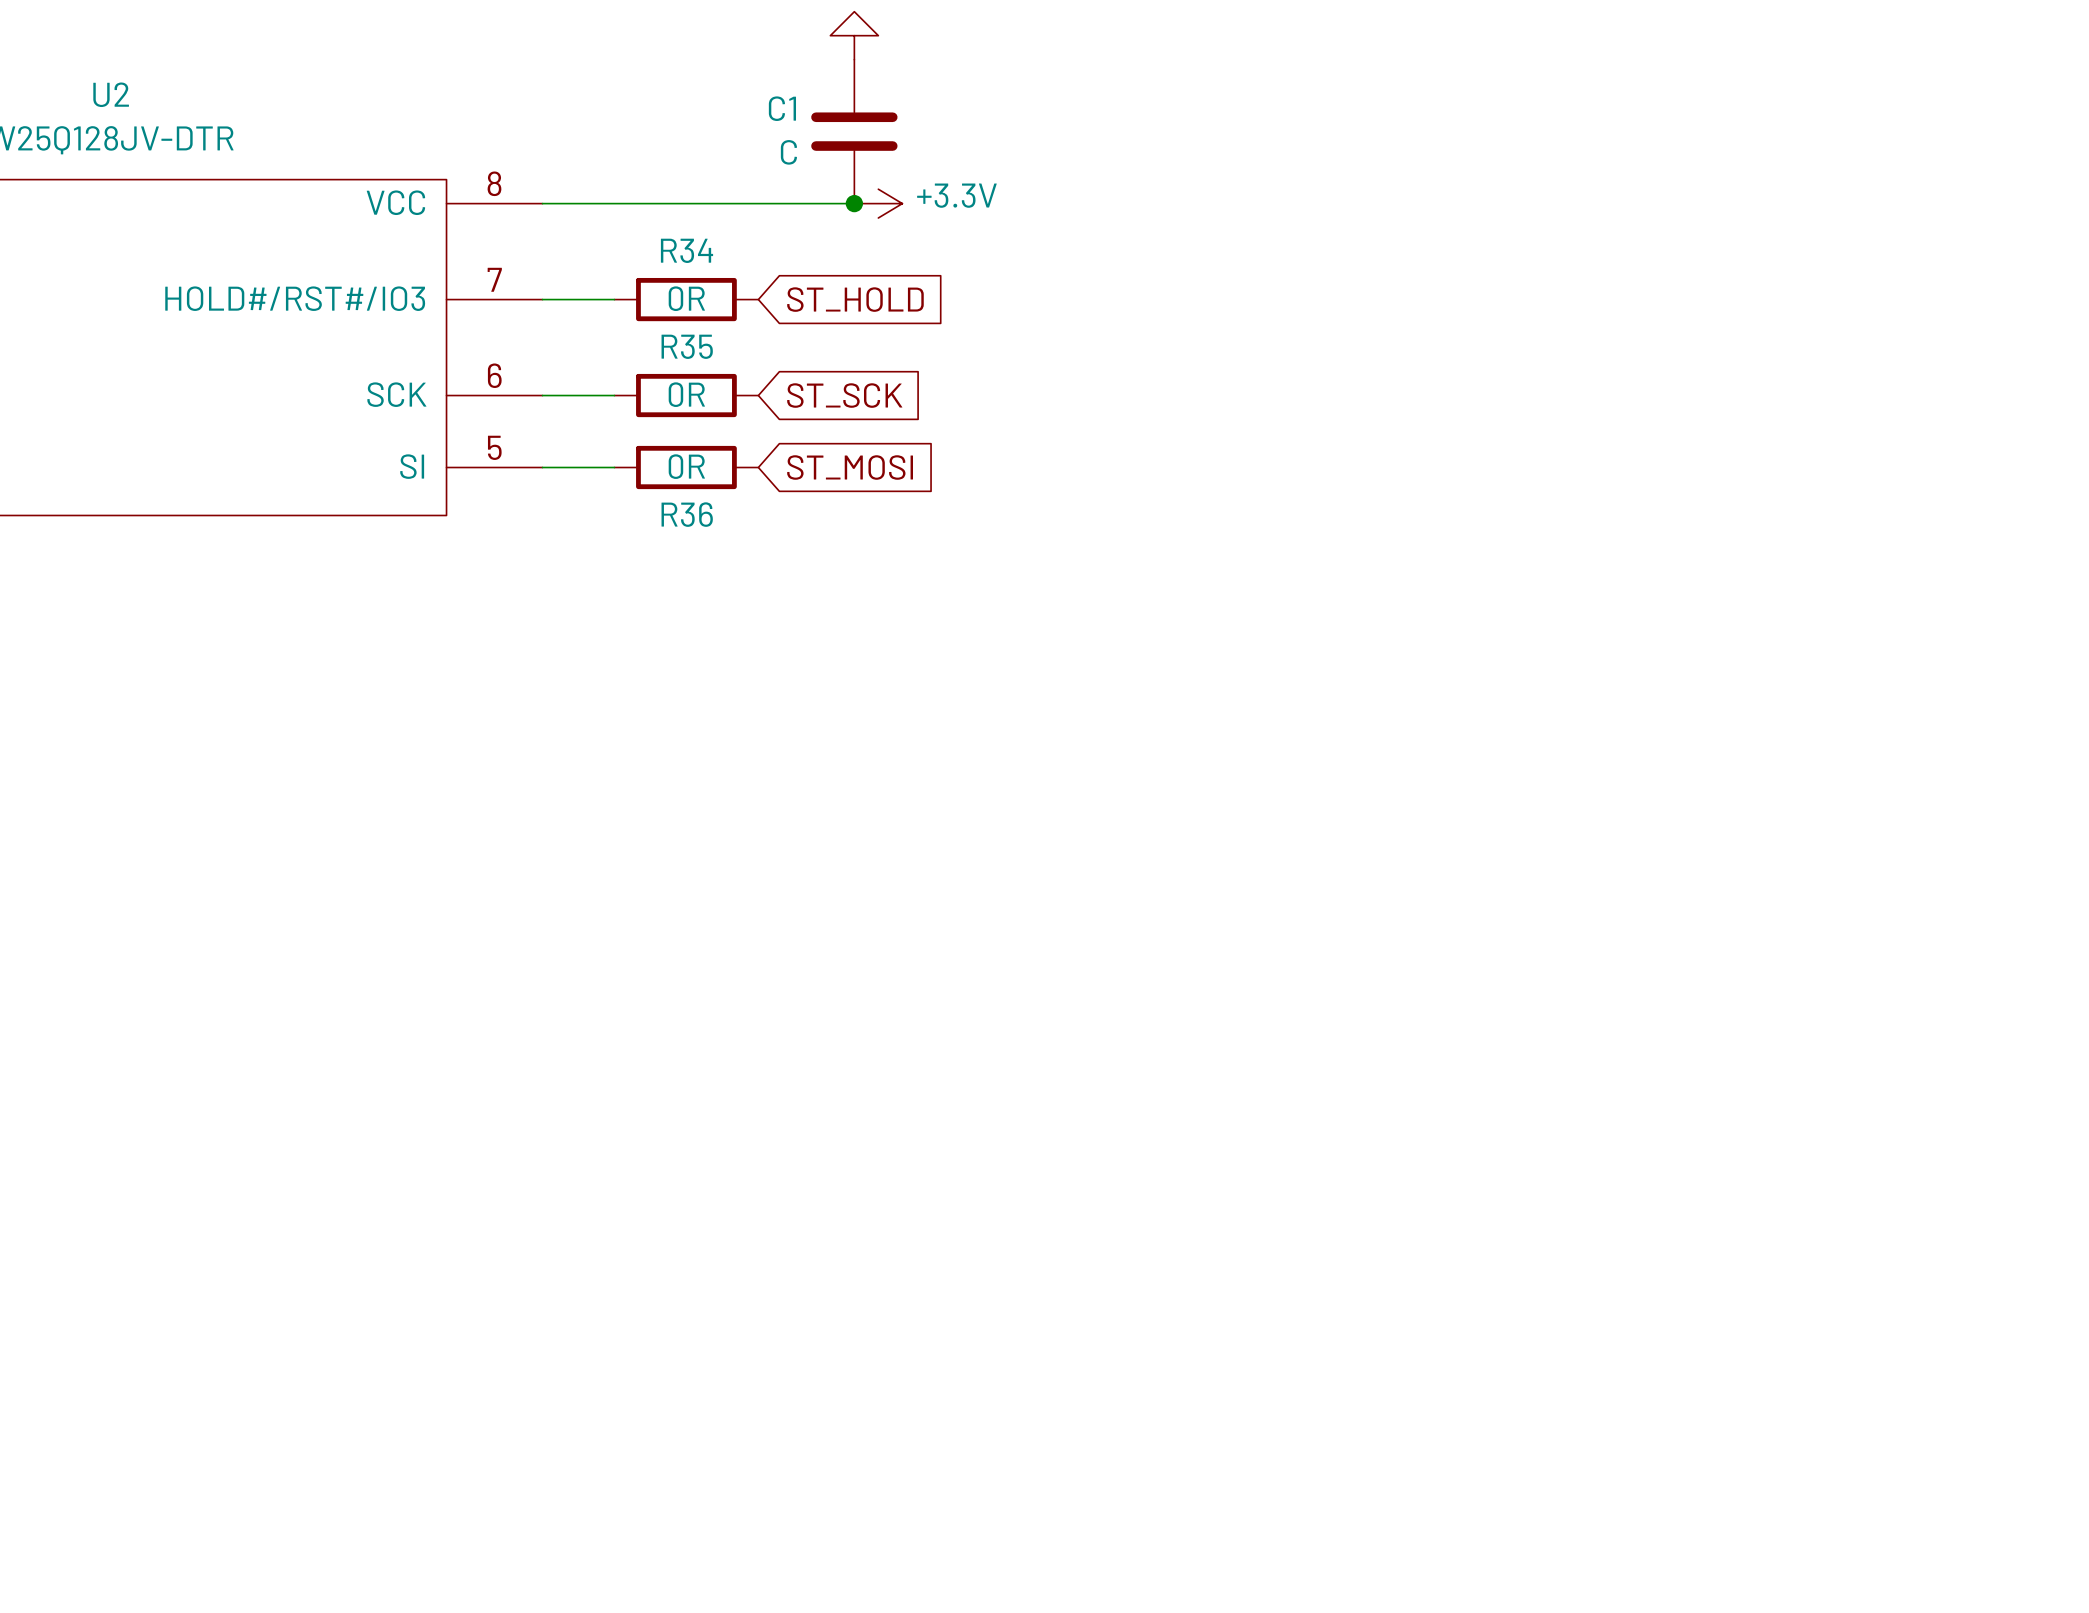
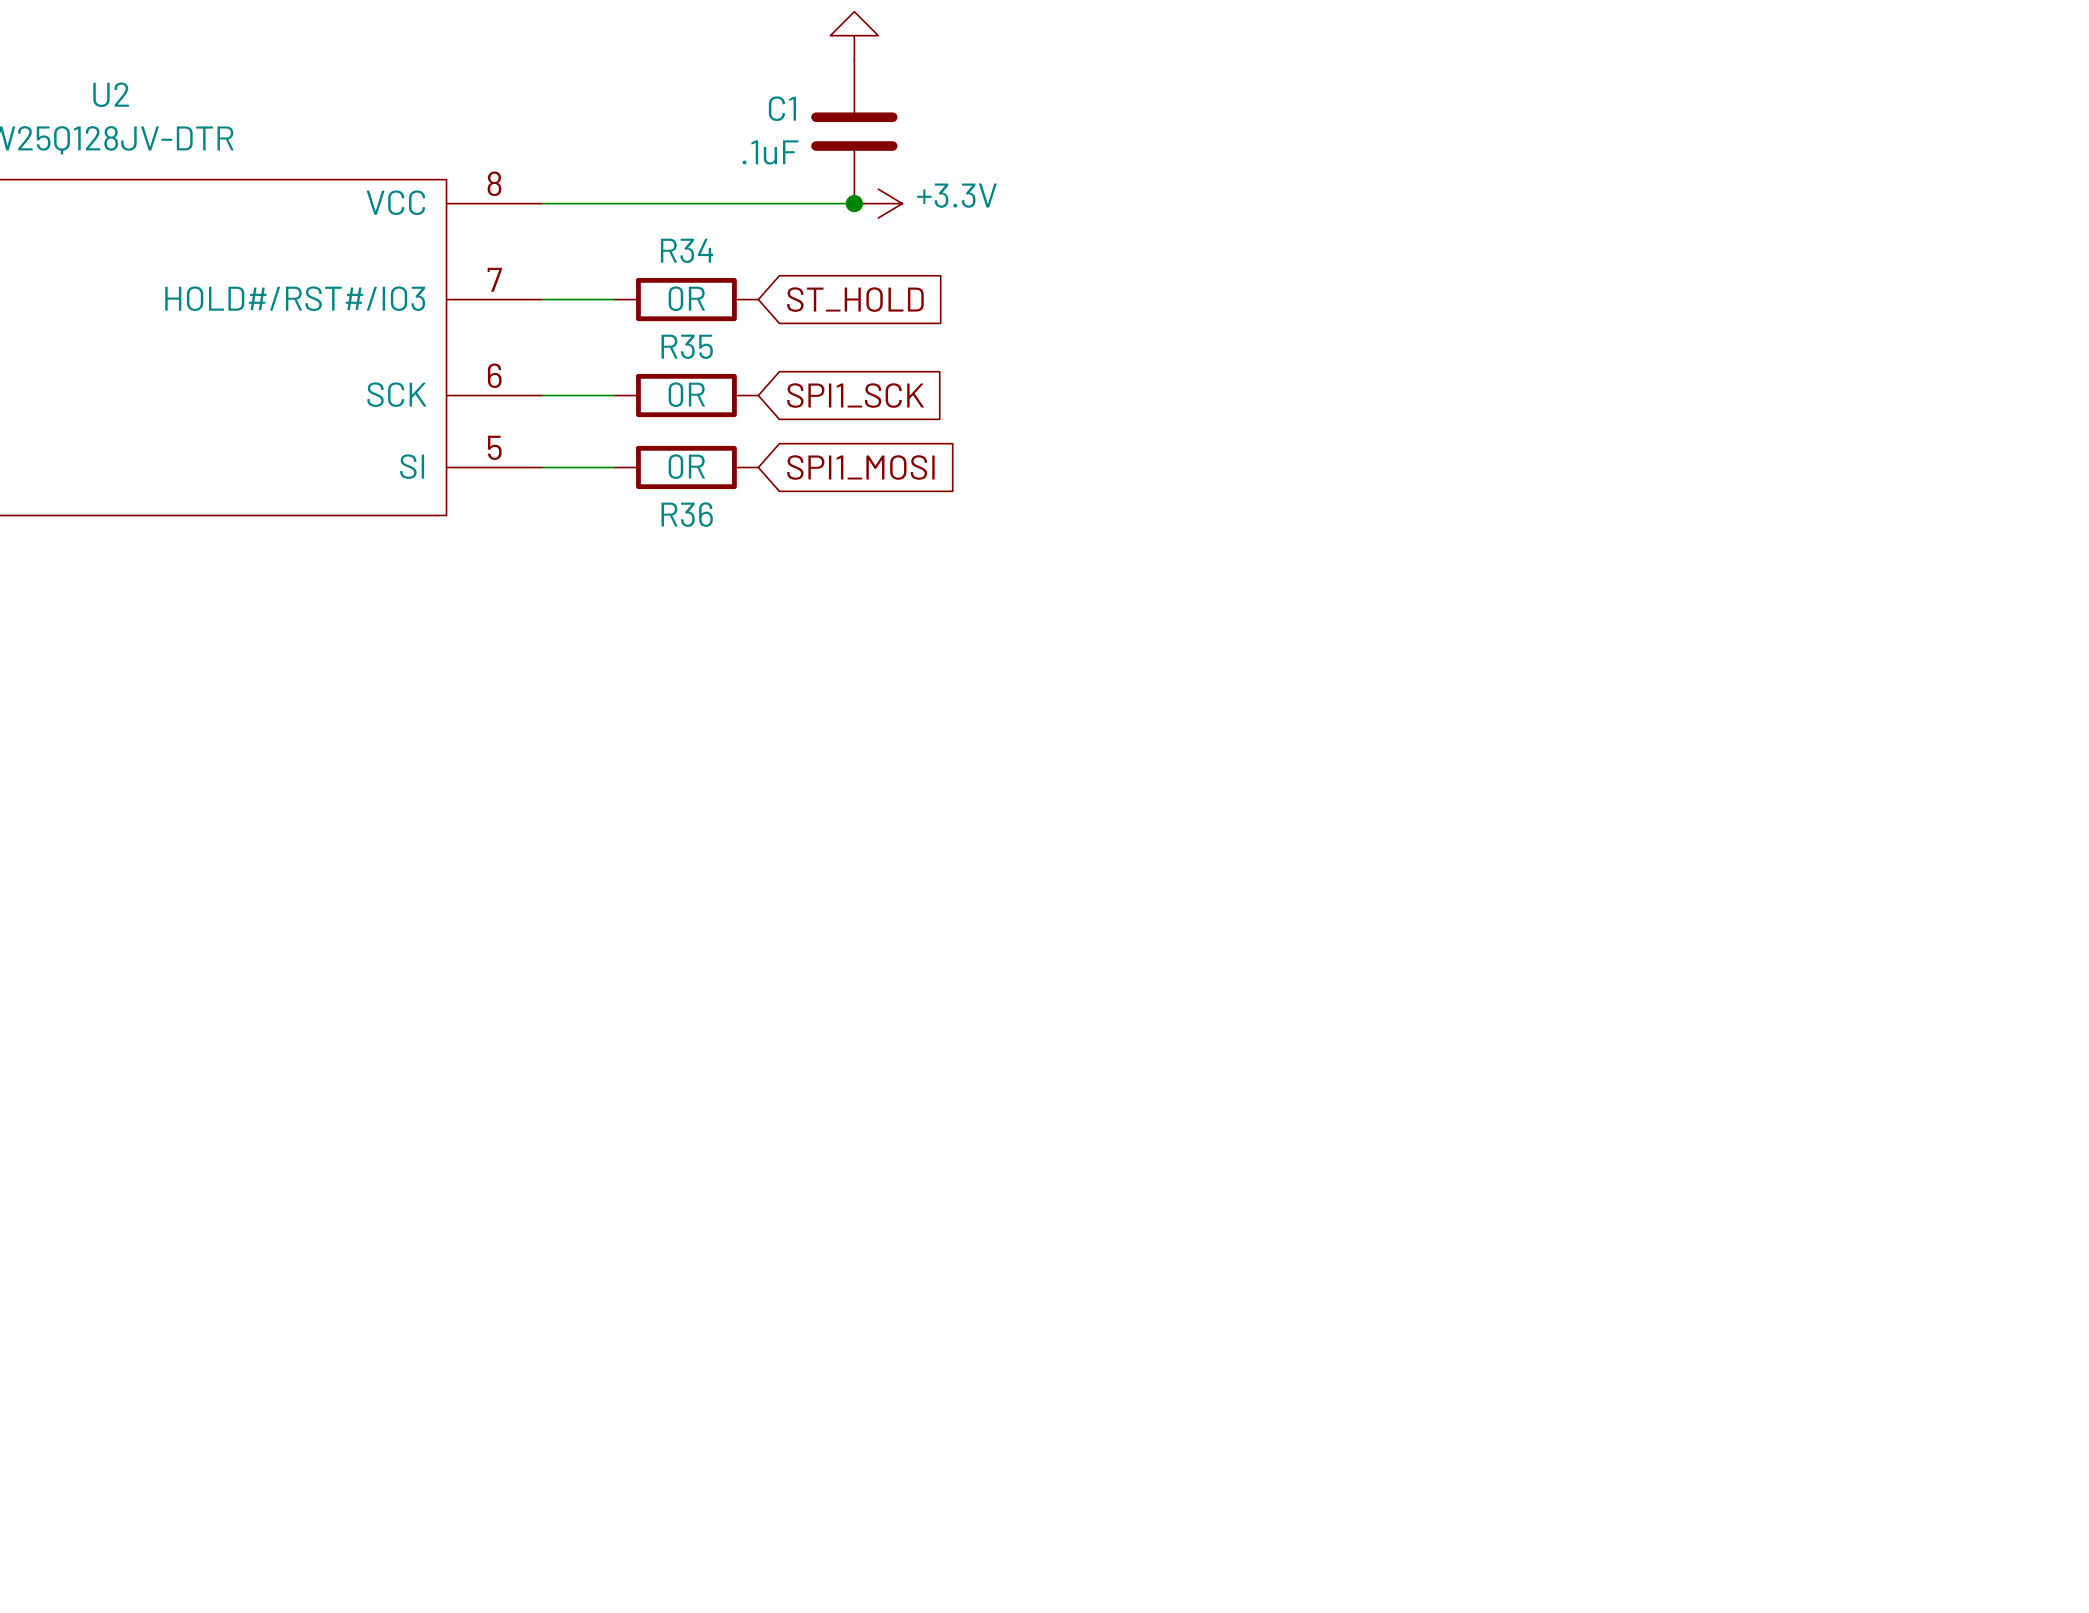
C1 value: C (788, 152) -> .1uF (770, 152)
global label: ST_SCK (844, 395) -> SPI1_SCK (855, 395)
global label: ST_MOSI (850, 467) -> SPI1_MOSI (860, 467)

